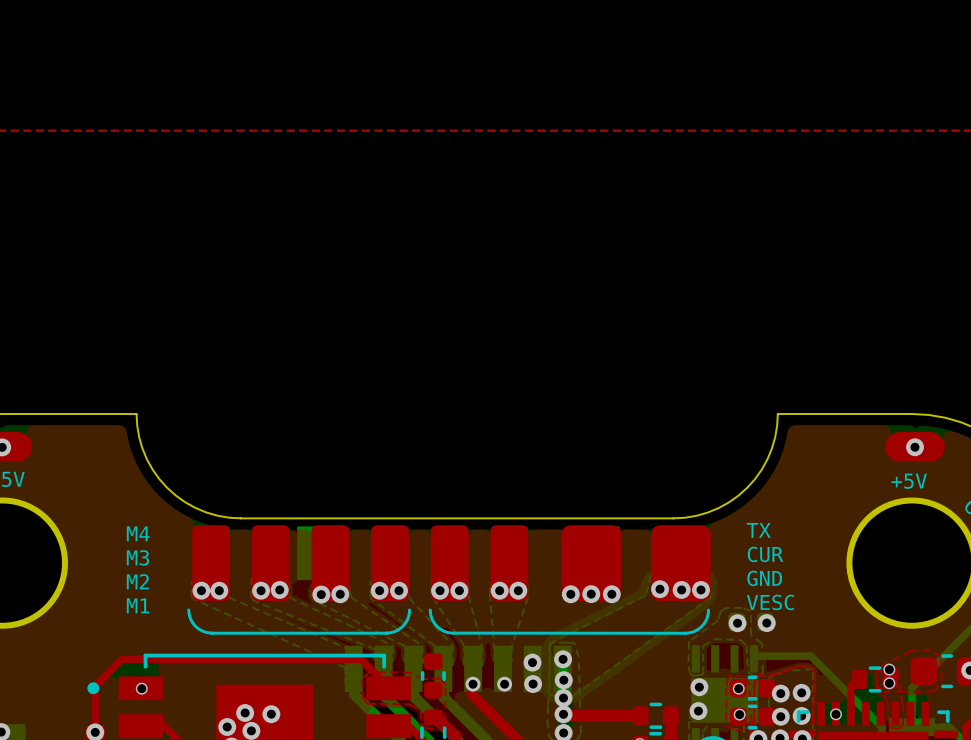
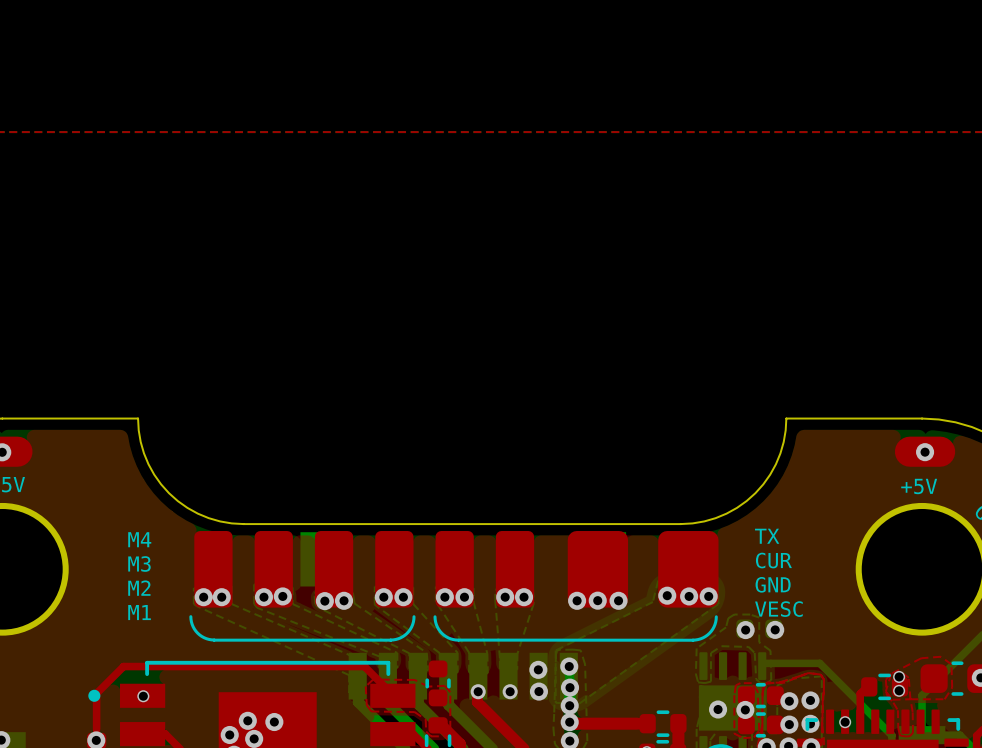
via: (699, 687) -> none
via: (738, 688) -> none
via: none -> (718, 709)
via: none -> (745, 709)
via: (698, 711) -> none
via: (739, 714) -> none

